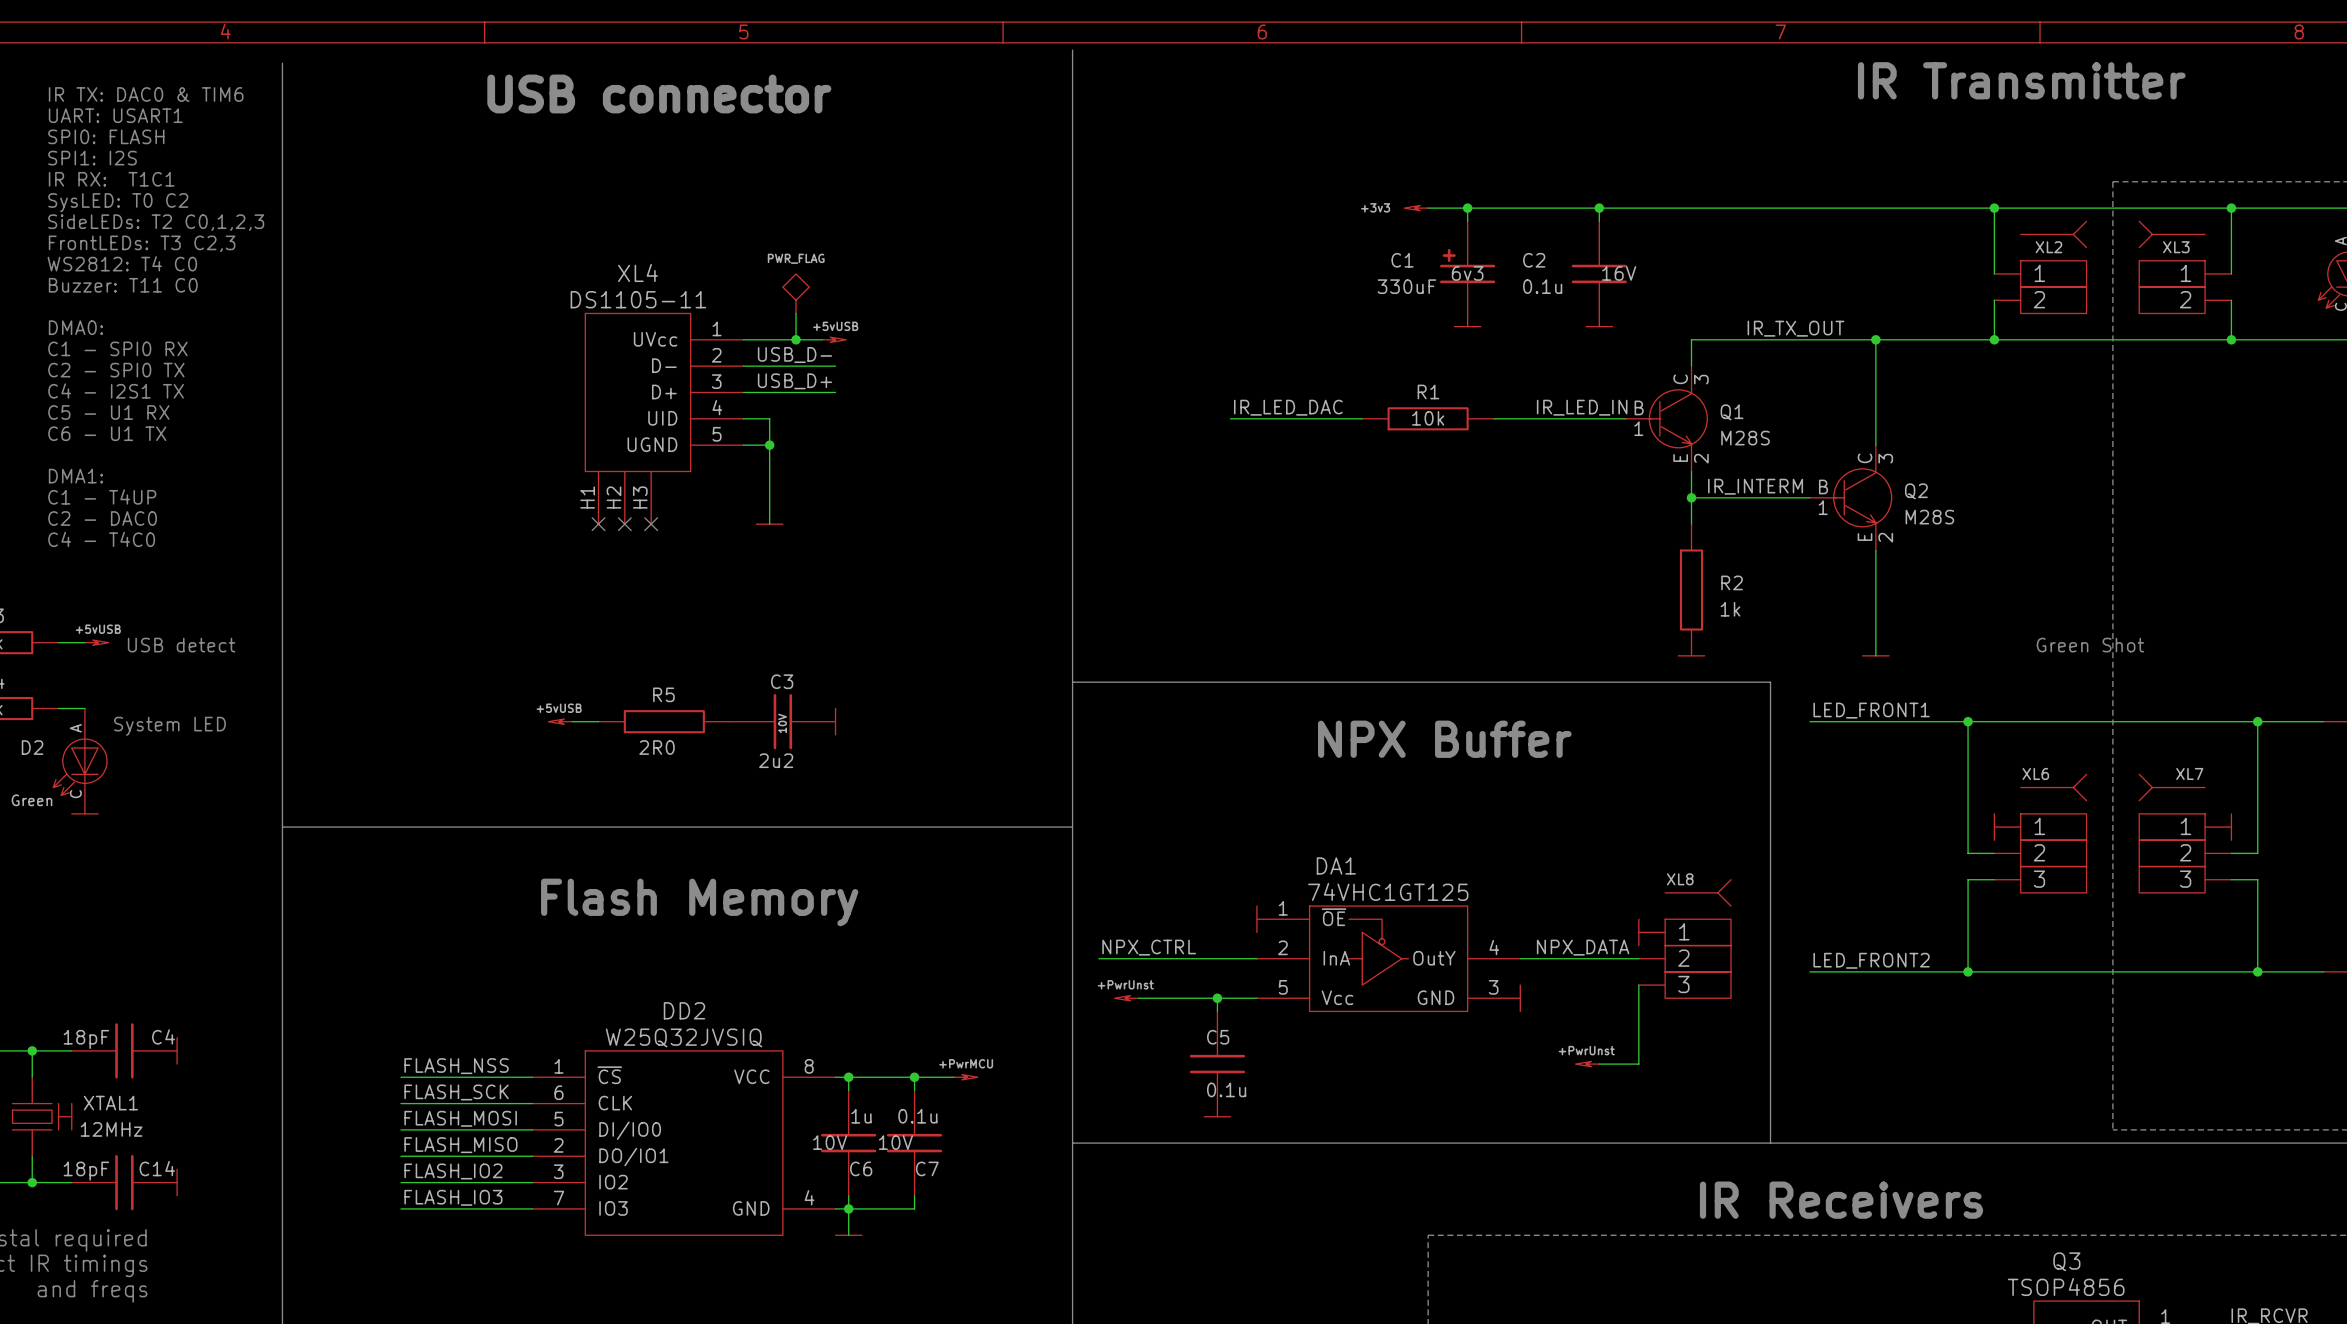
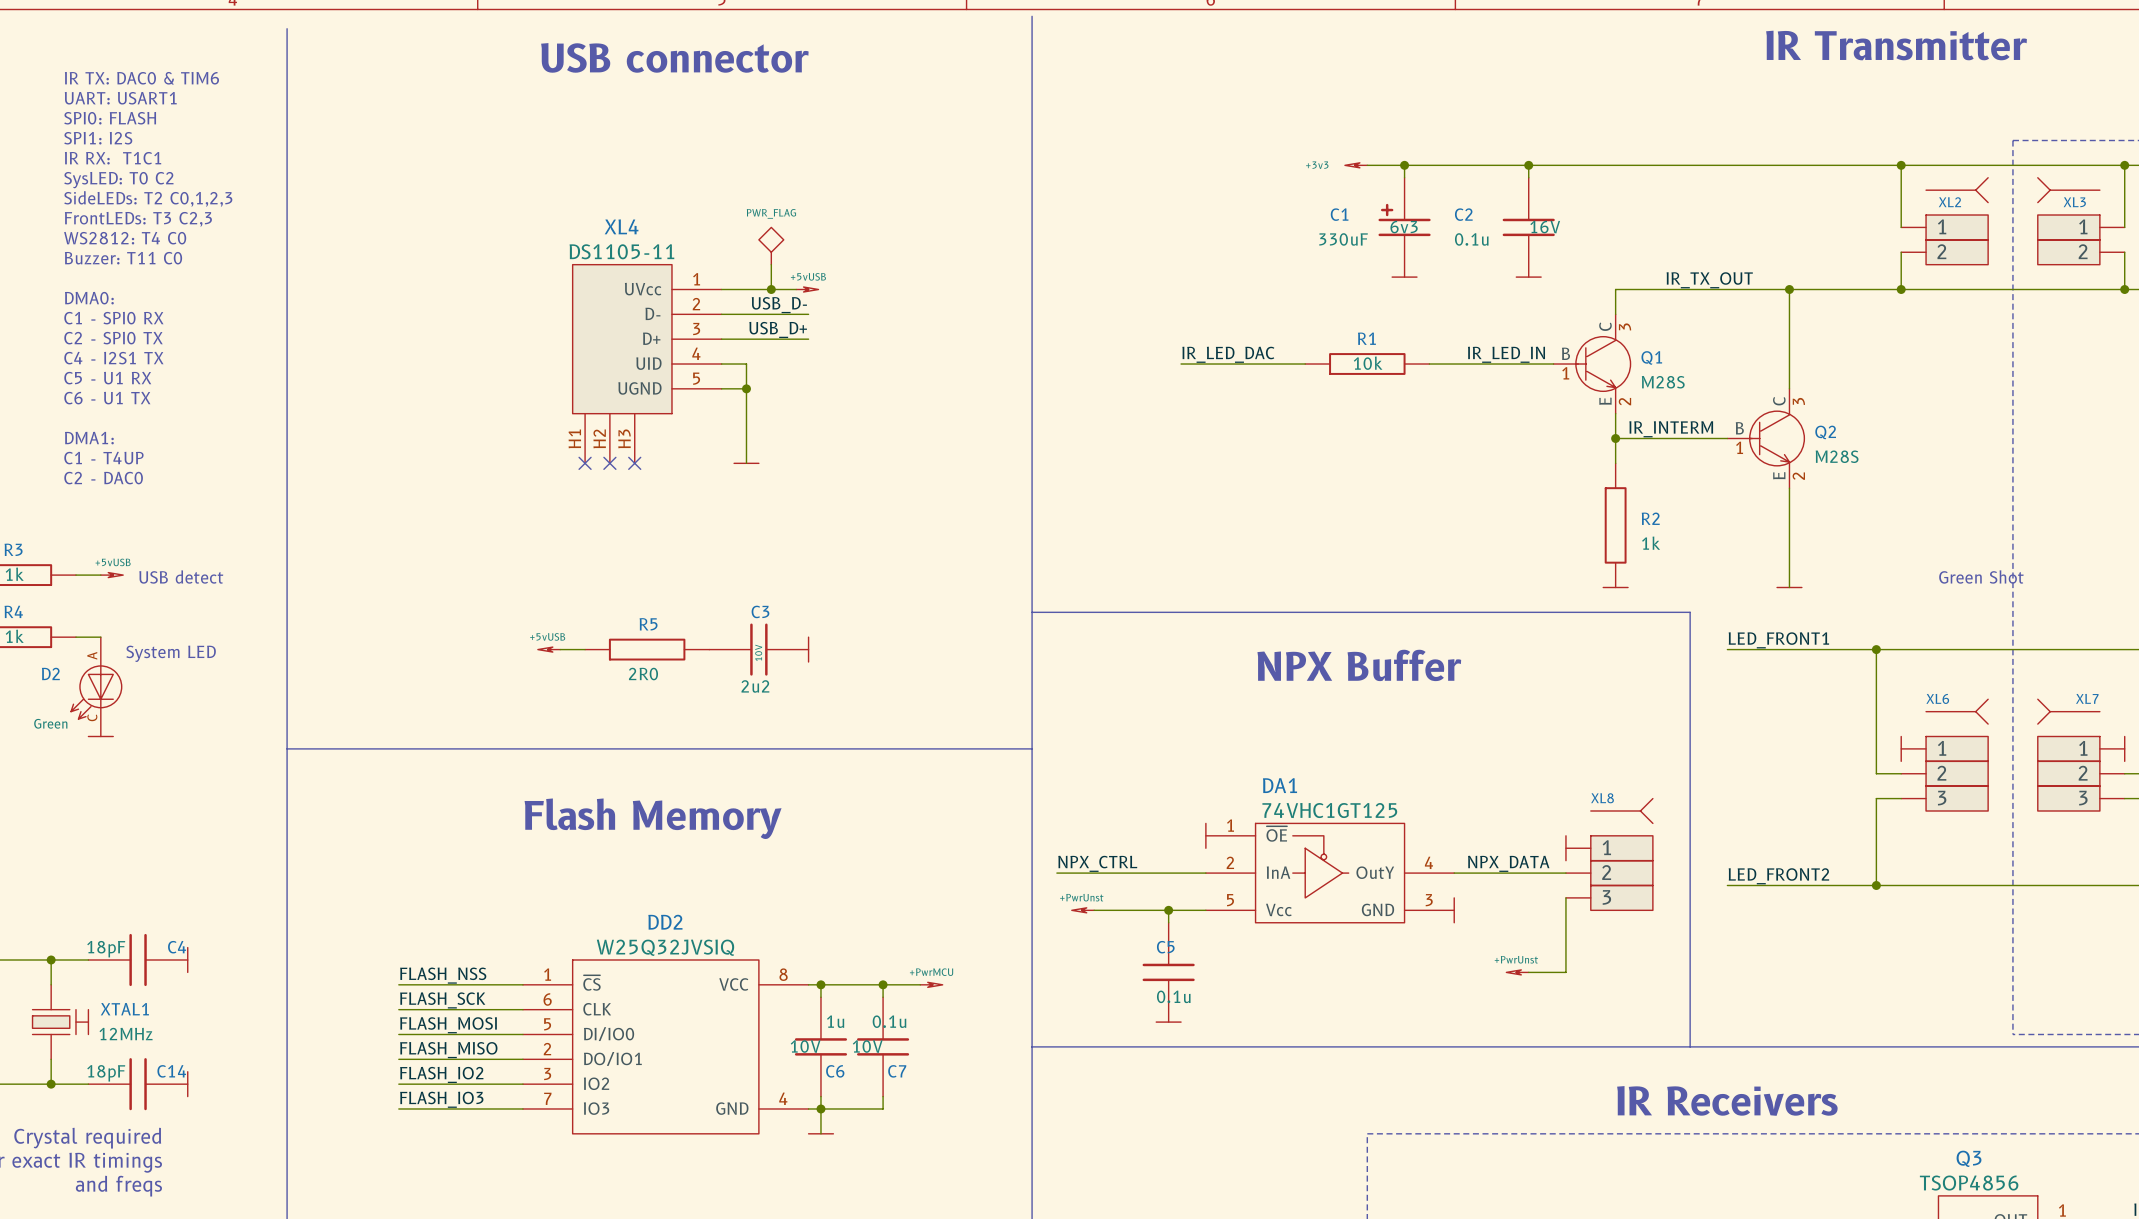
text: IR TX: DAC0 & TIM6 (146, 94) -> none
text: UART: USART1 (115, 115) -> IR TX: DAC0 & TIM6 (141, 78)
text: SPI0: FLASH (106, 136) -> UART: USART1 (120, 98)
text: SPI1: I2S (92, 158) -> SPI0: FLASH (110, 118)
text: IR RX: T1C1 (111, 179) -> SPI1: I2S (98, 138)
text: SysLED: T0 C2 (118, 202) -> IR RX: T1C1 (113, 158)
text: SideLEDs: T2 C0,1,2,3 (156, 222) -> SysLED: T0 C2 (118, 180)
text: FrontLEDs: T3 C2,3 (142, 243) -> SideLEDs: T2 C0,1,2,3 (148, 198)
text: WS2812: T4 C0 (122, 263) -> FrontLEDs: T3 C2,3 (138, 219)
text: Buzzer: T11 C0 (123, 285) -> WS2812: T4 C0 (125, 238)
text: none -> Buzzer: T11 C0 (123, 258)
text: DMA0: (75, 327) -> none
text: C1 - SPI0 RX (117, 348) -> DMA0: (89, 298)
text: C2 - SPI0 TX (116, 370) -> C1 - SPI0 RX (113, 318)
text: C4 - I2S1 TX (116, 390) -> C2 - SPI0 TX (113, 338)
text: C5 - U1 RX (108, 412) -> C4 - I2S1 TX (113, 358)
text: C6 - U1 TX (107, 433) -> C5 - U1 RX (107, 378)
text: none -> C6 - U1 TX (107, 398)
text: DMA1: (75, 476) -> none
text: C1 - T4UP (102, 497) -> DMA1: (89, 438)
text: C2 - DAC0 (102, 518) -> C1 - T4UP (103, 458)
text: C4 - T4C0 (101, 539) -> C2 - DAC0 (103, 478)

